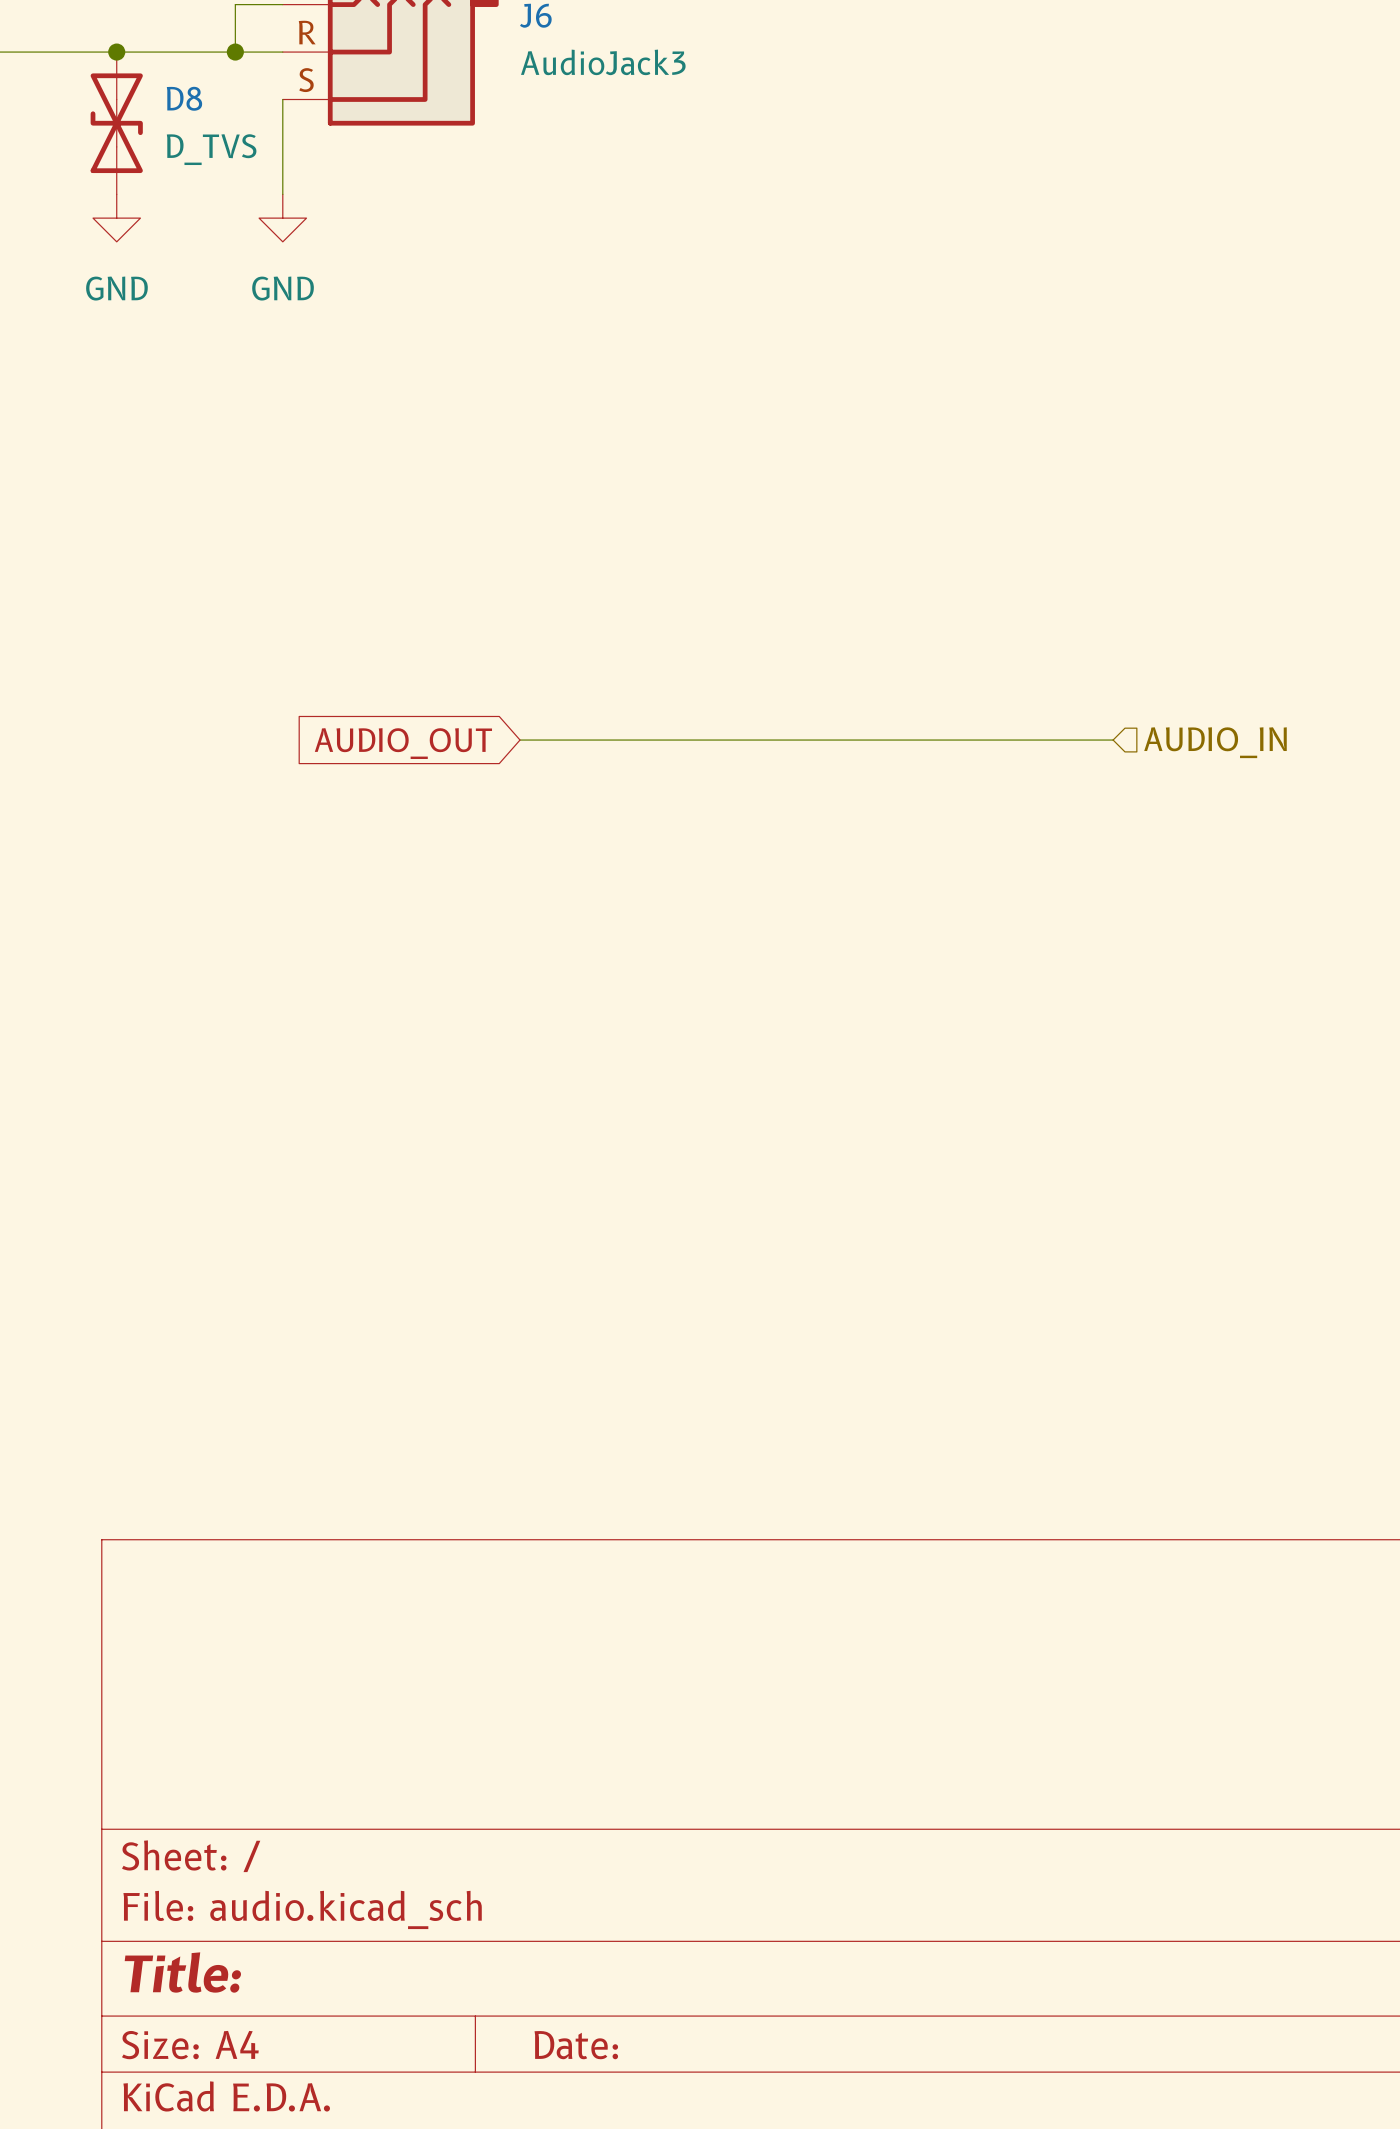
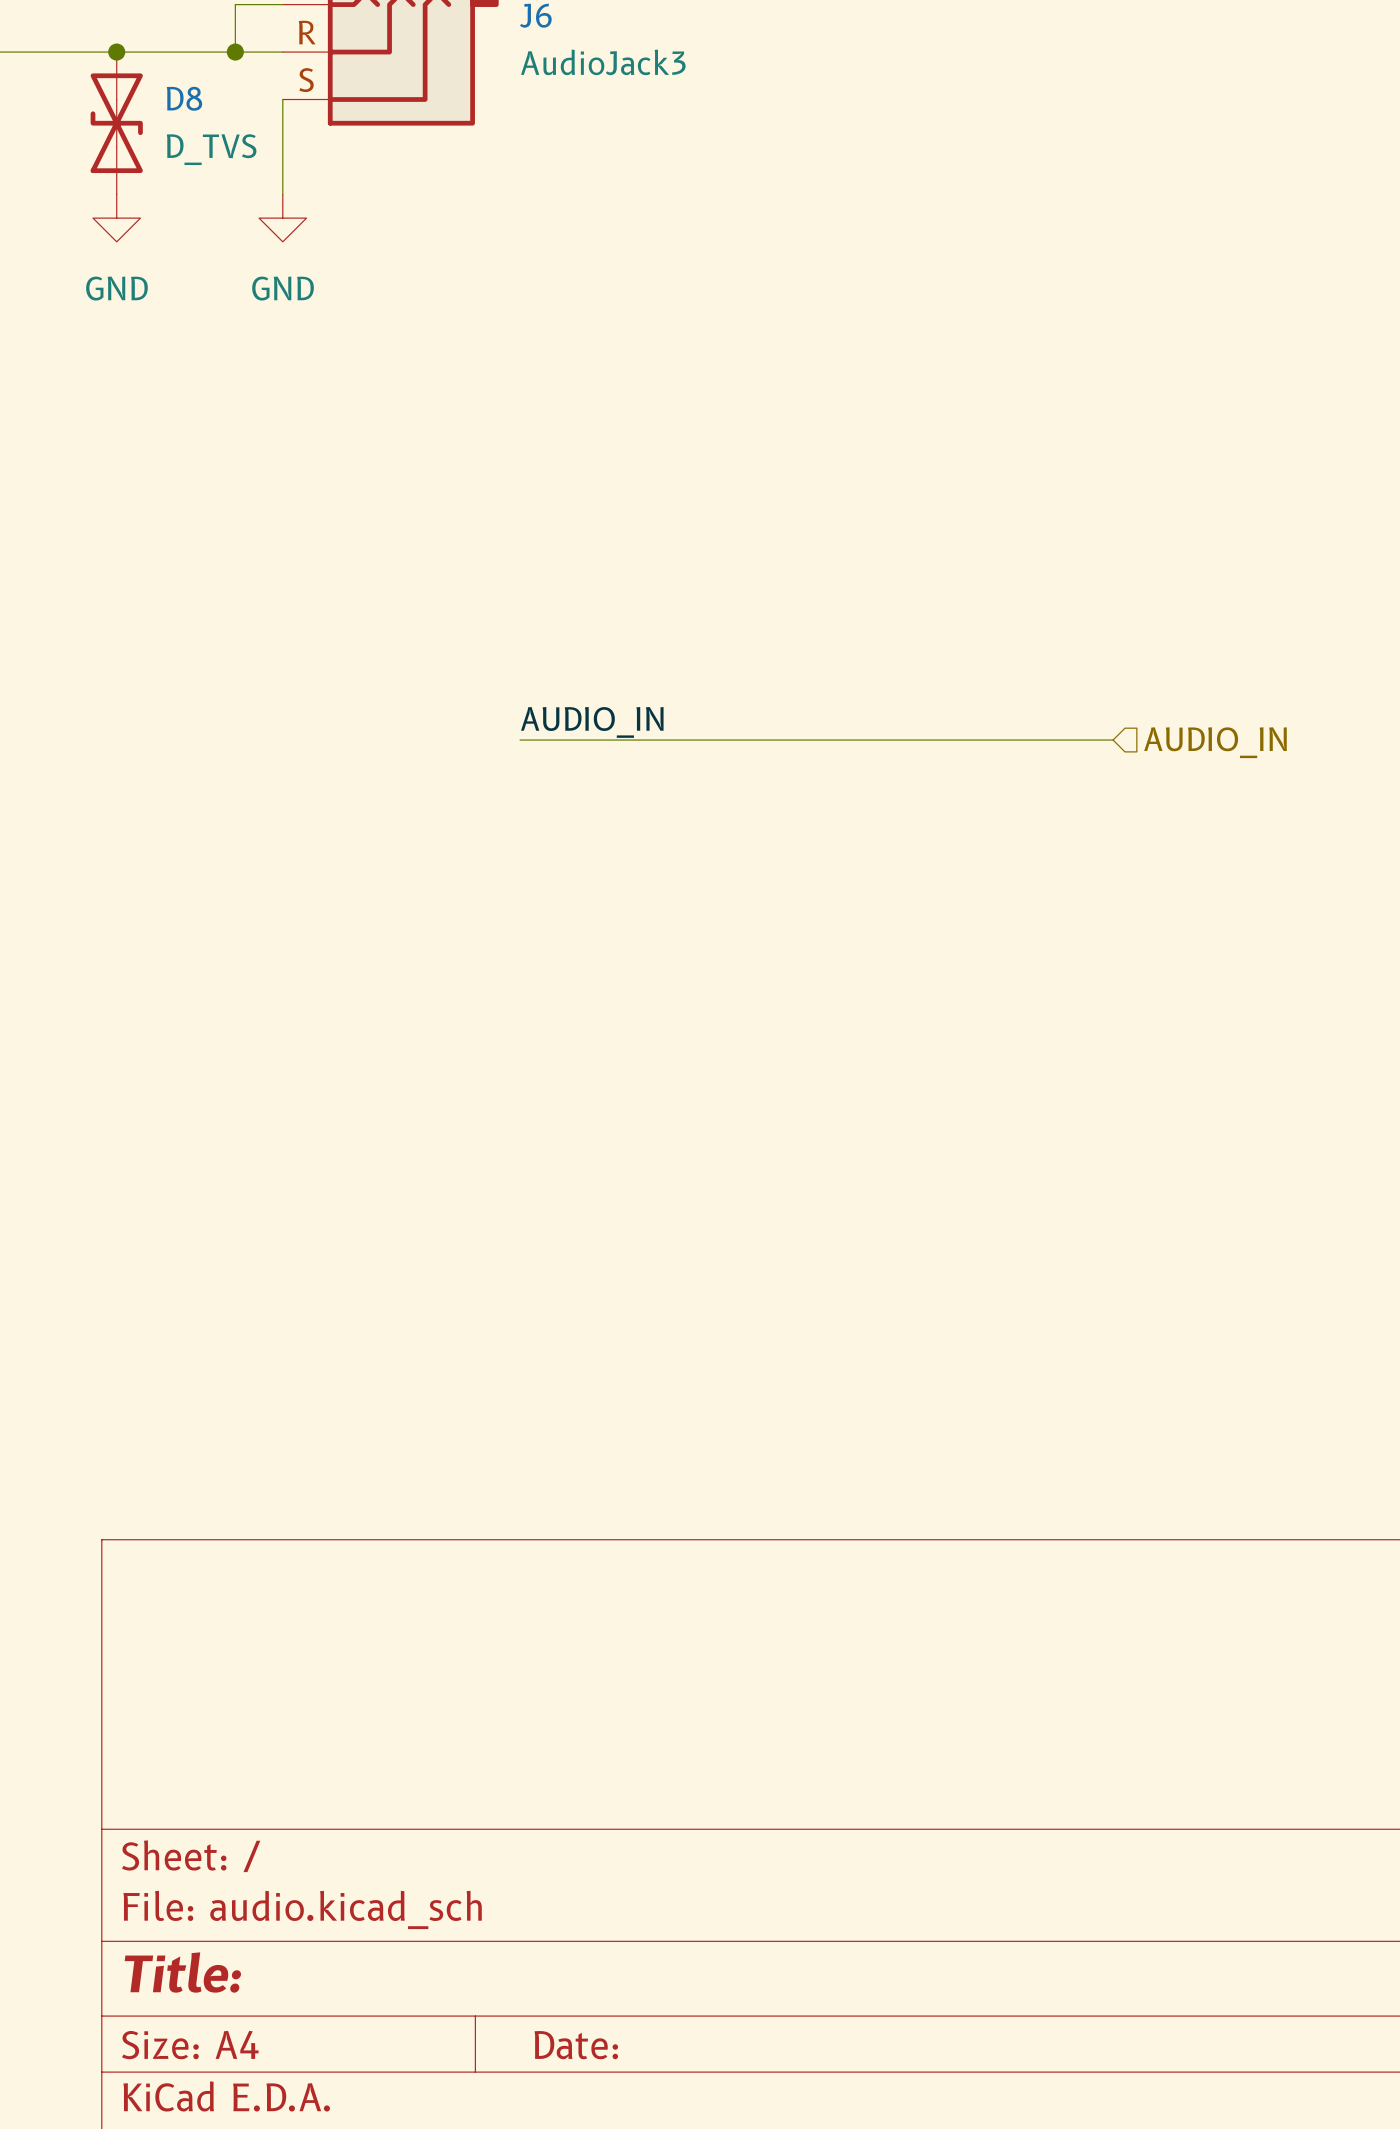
label: none -> AUDIO_IN (592, 722)
global label: AUDIO_OUT (403, 743) -> none

